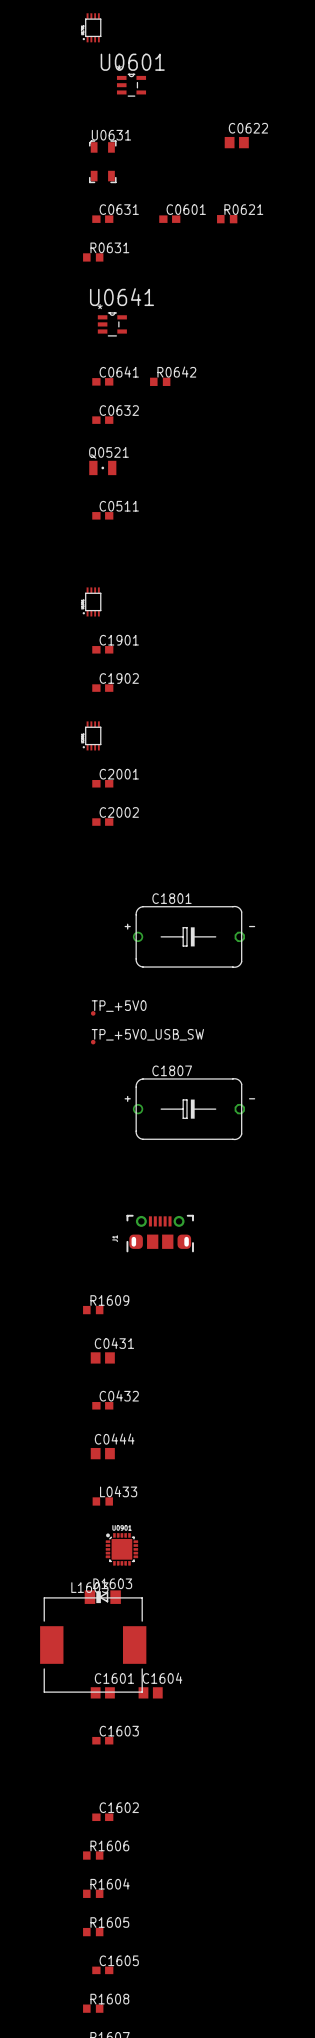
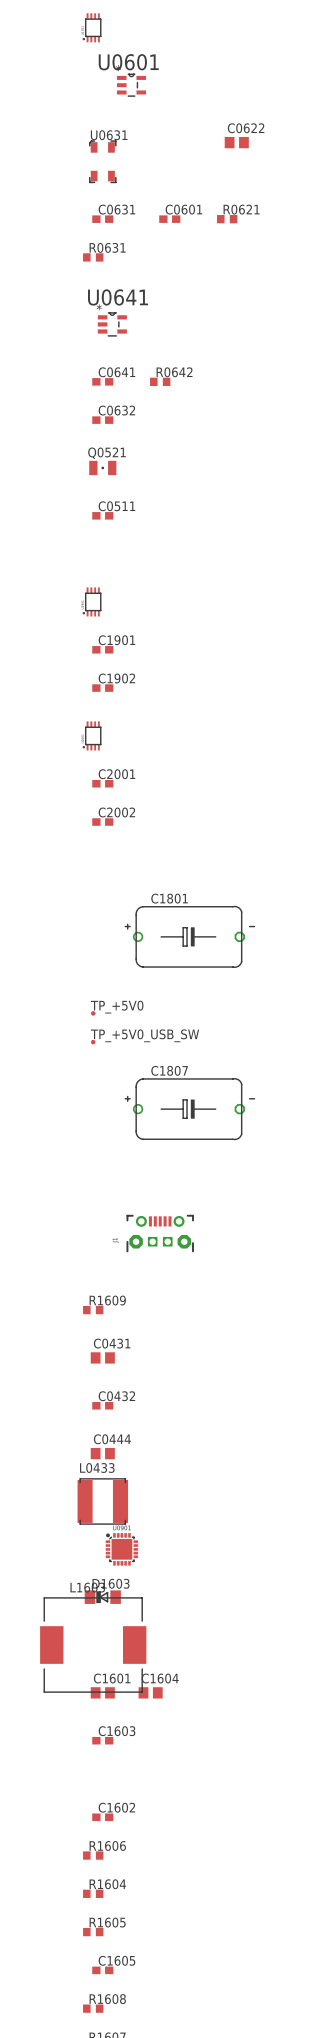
part footprint: [126, 1214, 194, 1253] -> [126, 1214, 194, 1253]
L0433 name position: L0433 (118, 1491) -> L0433 (97, 1467)
L0433 footprint: [92, 1497, 113, 1506] -> [77, 1478, 129, 1525]

